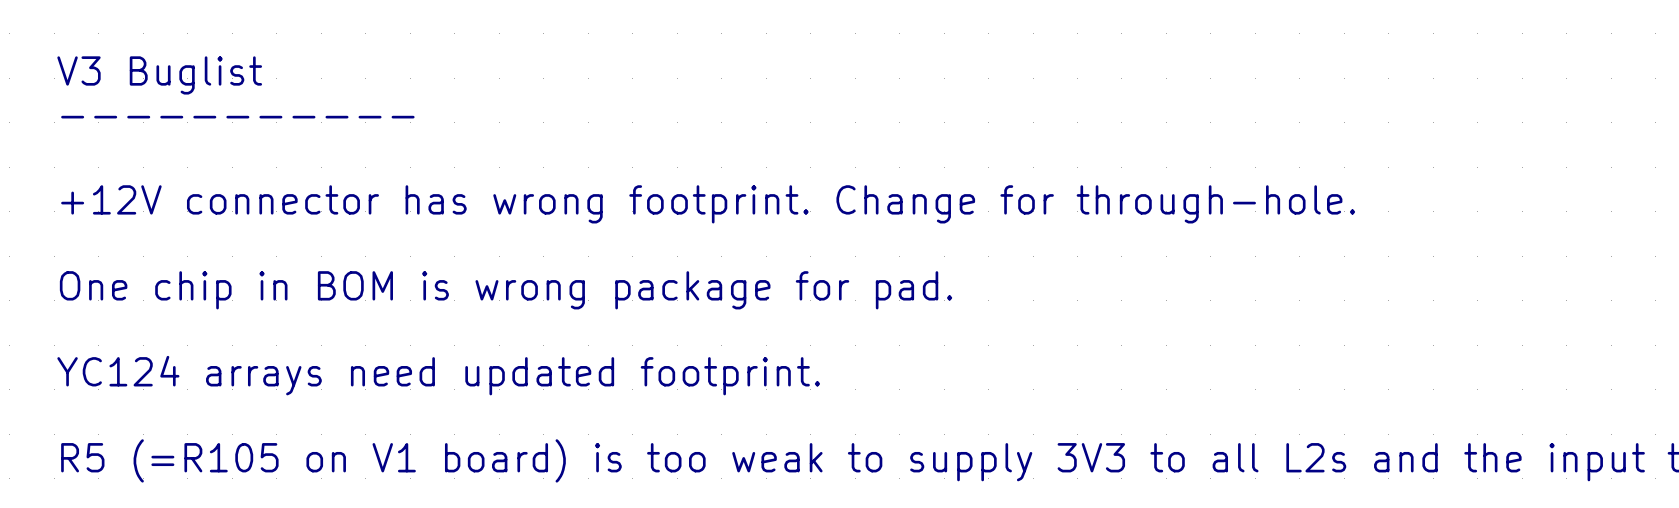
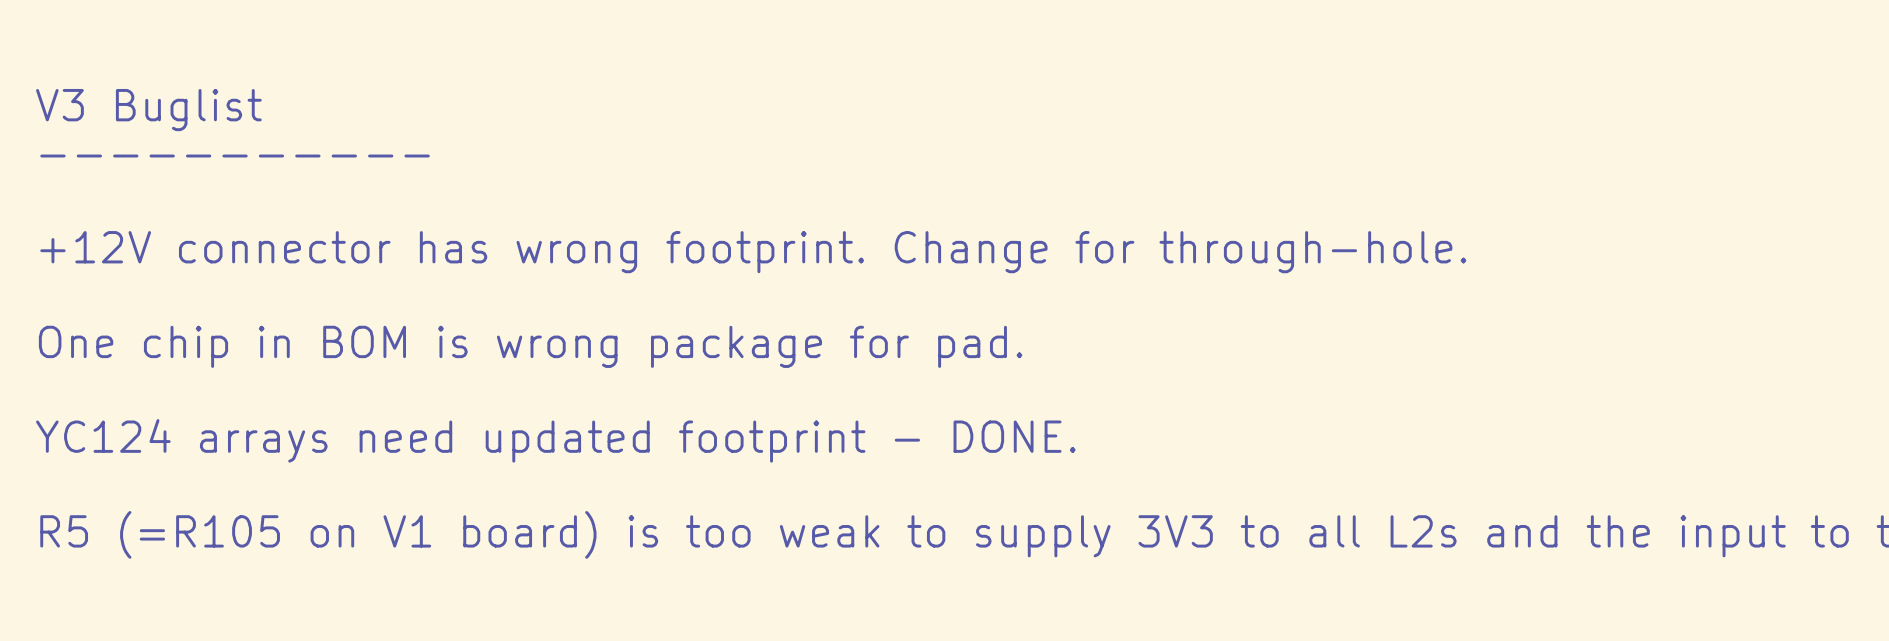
text: YC124 arrays need updated footprint. (438, 375) -> YC124 arrays need updated footprint - DONE. (555, 440)

